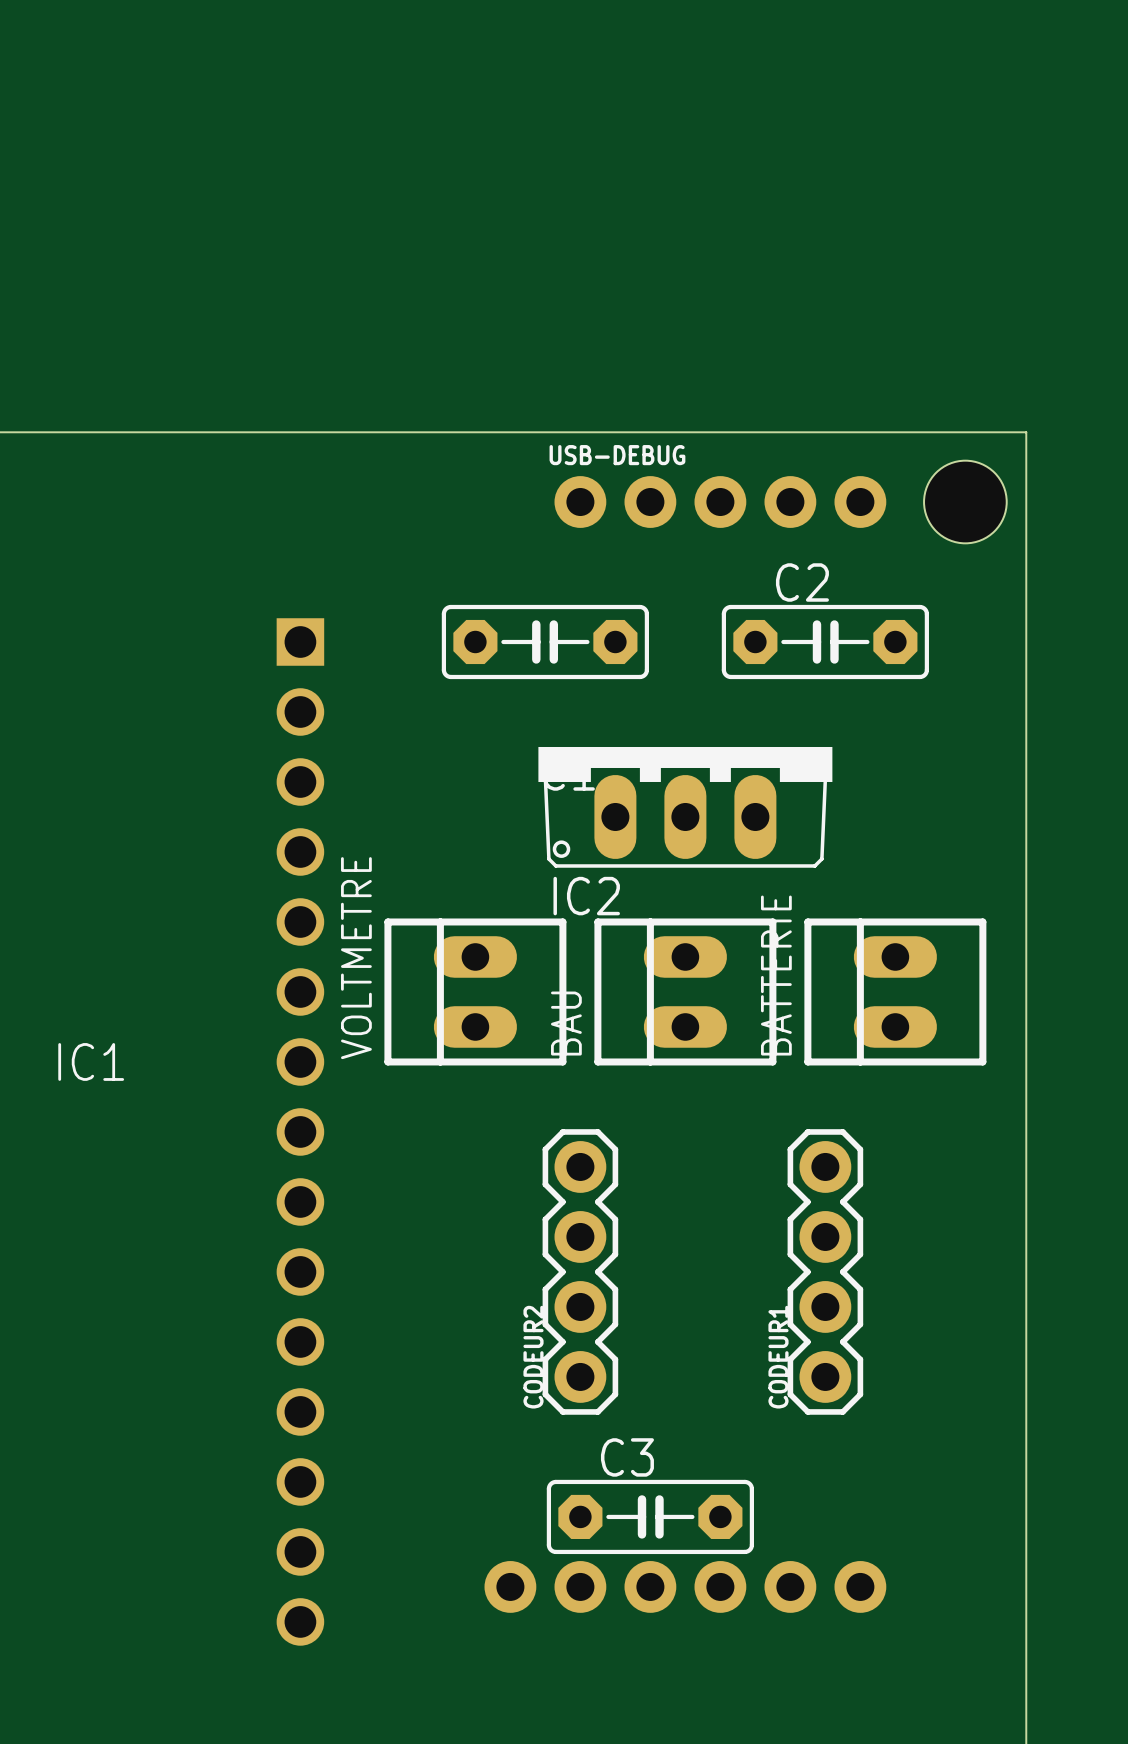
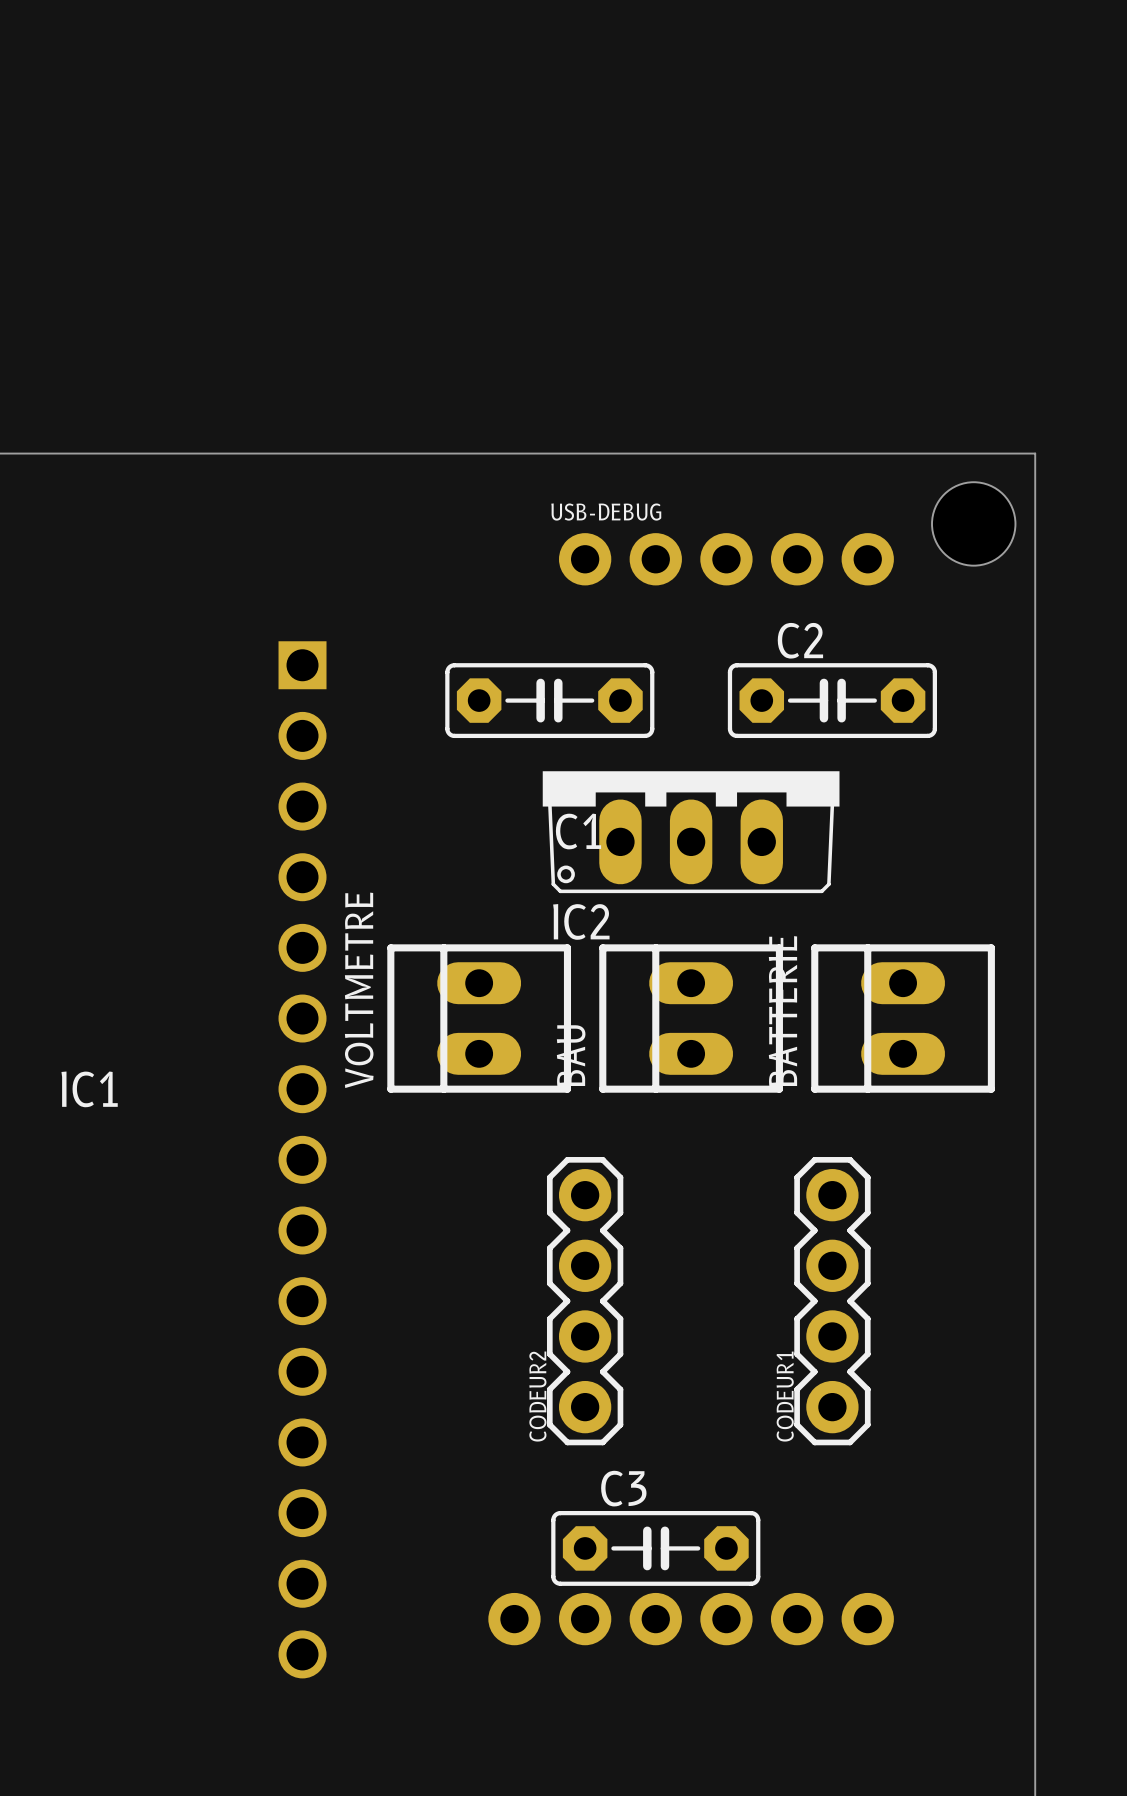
USB-DEBUG position: (720, 502) -> (726, 559)
C1 position: (545, 642) -> (549, 700)
C2 position: (825, 642) -> (832, 700)

